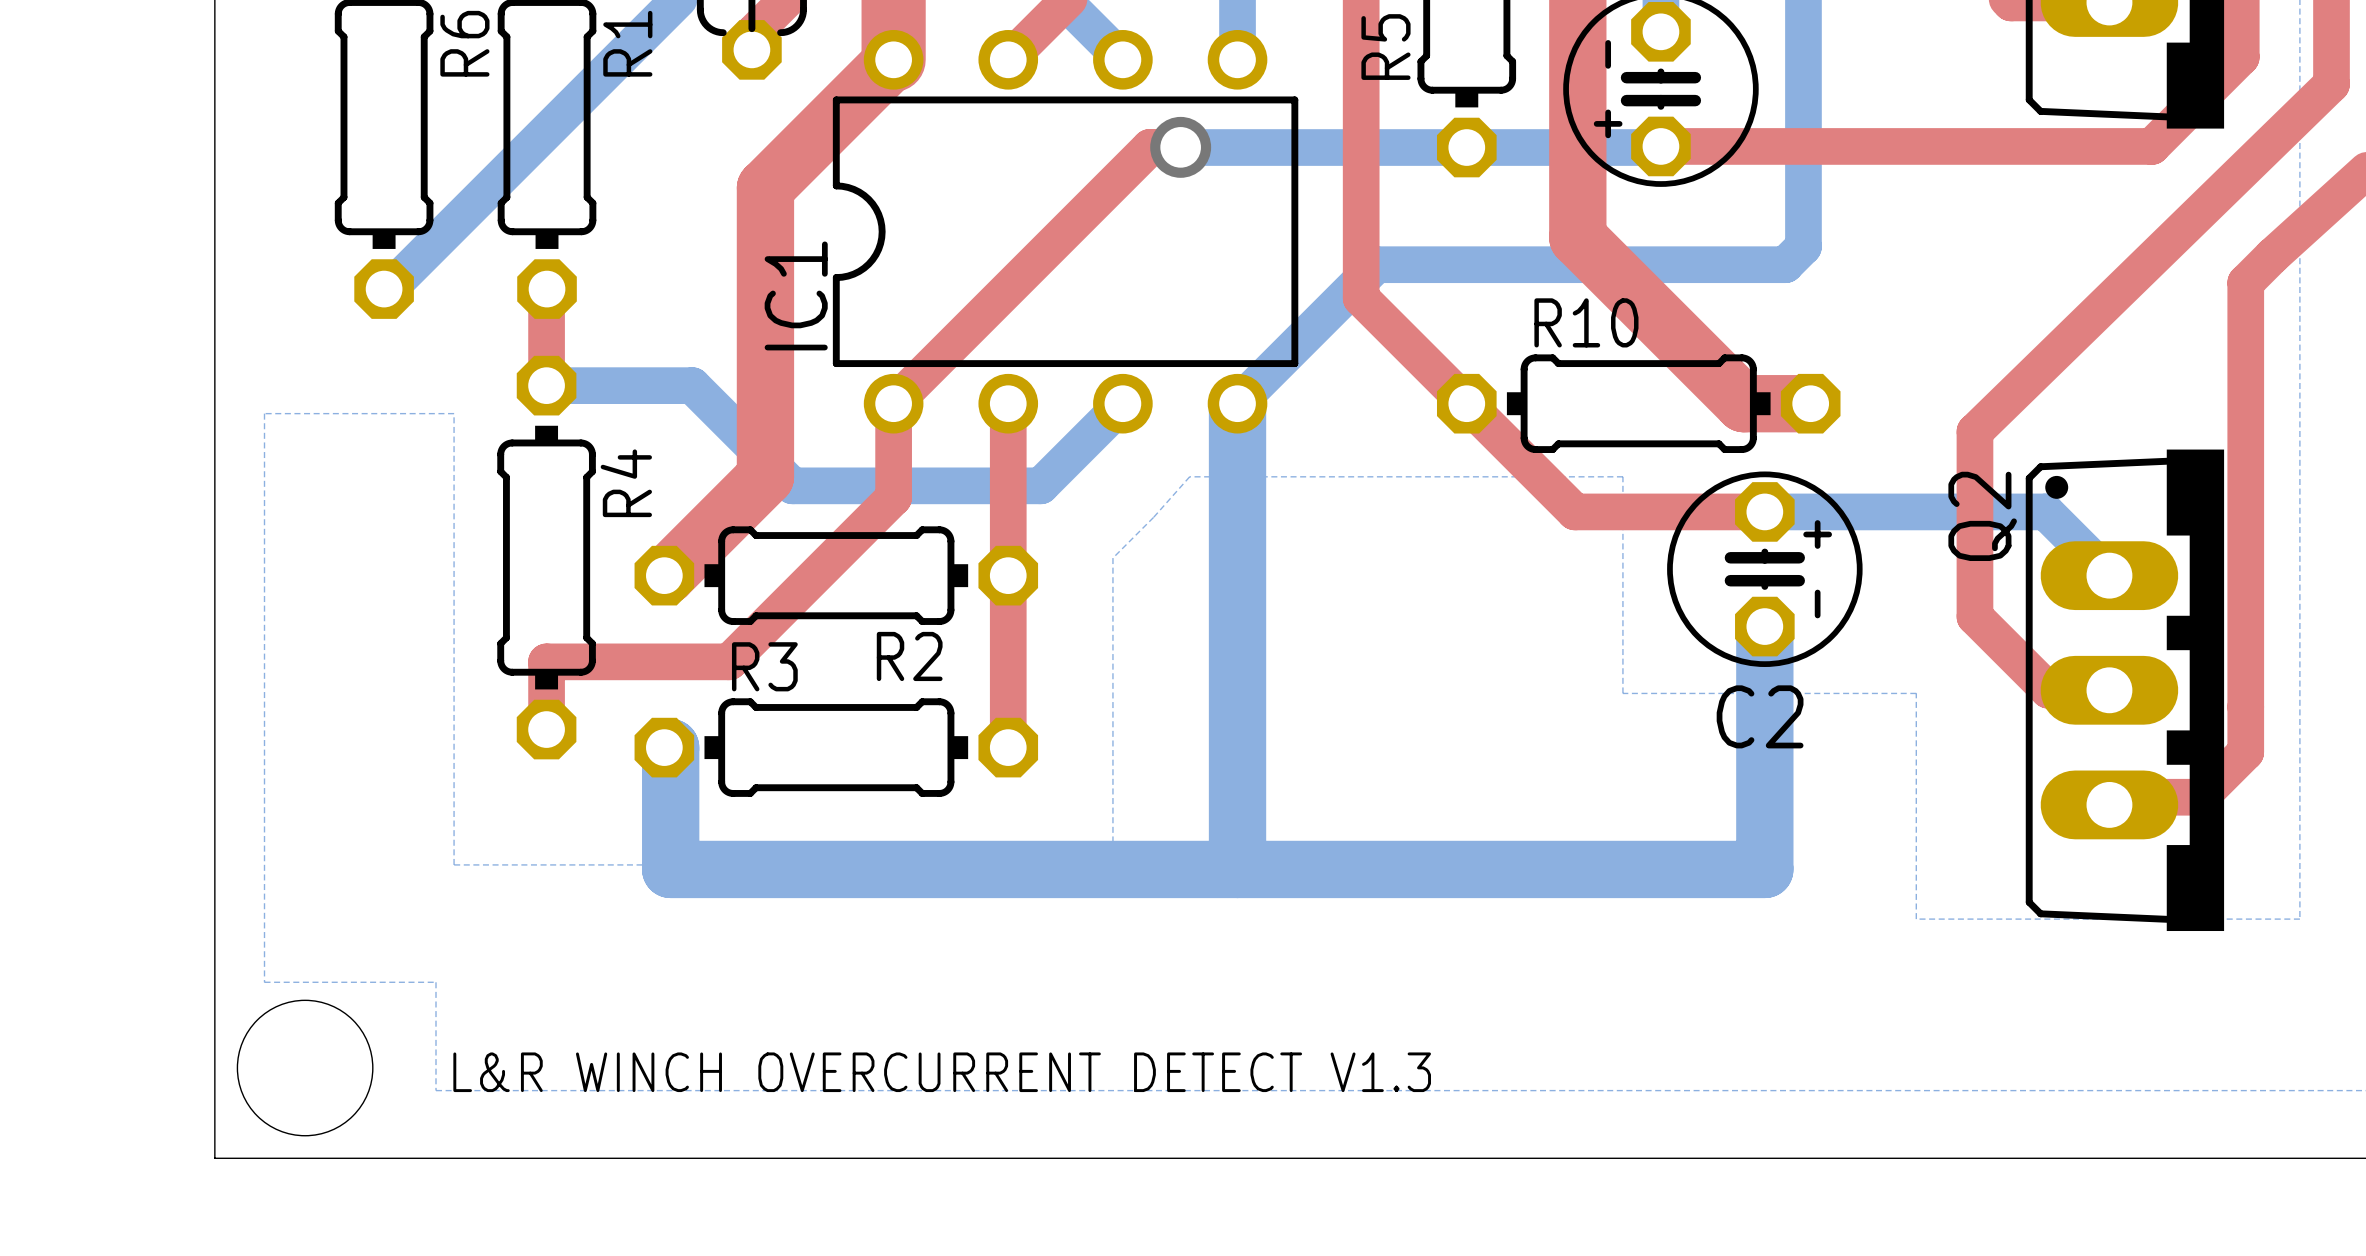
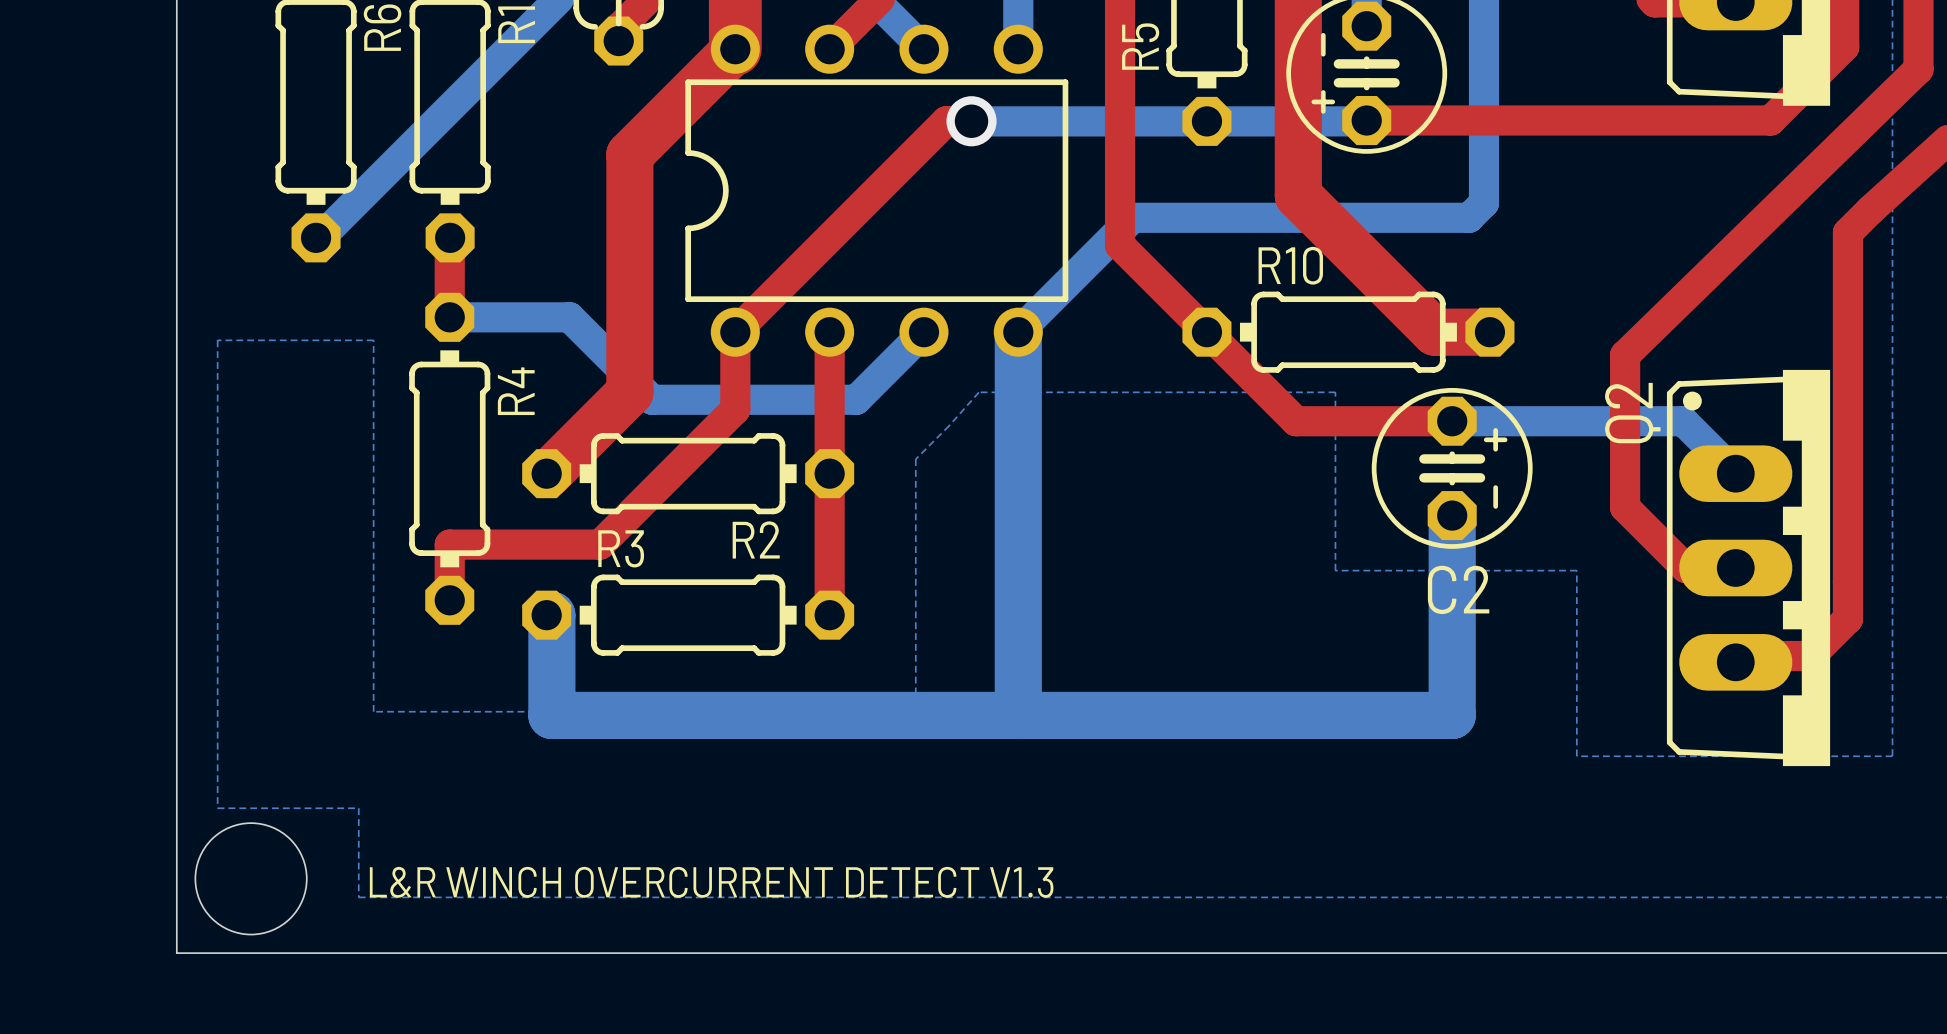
IC1 name: IC1 (796, 295) -> none

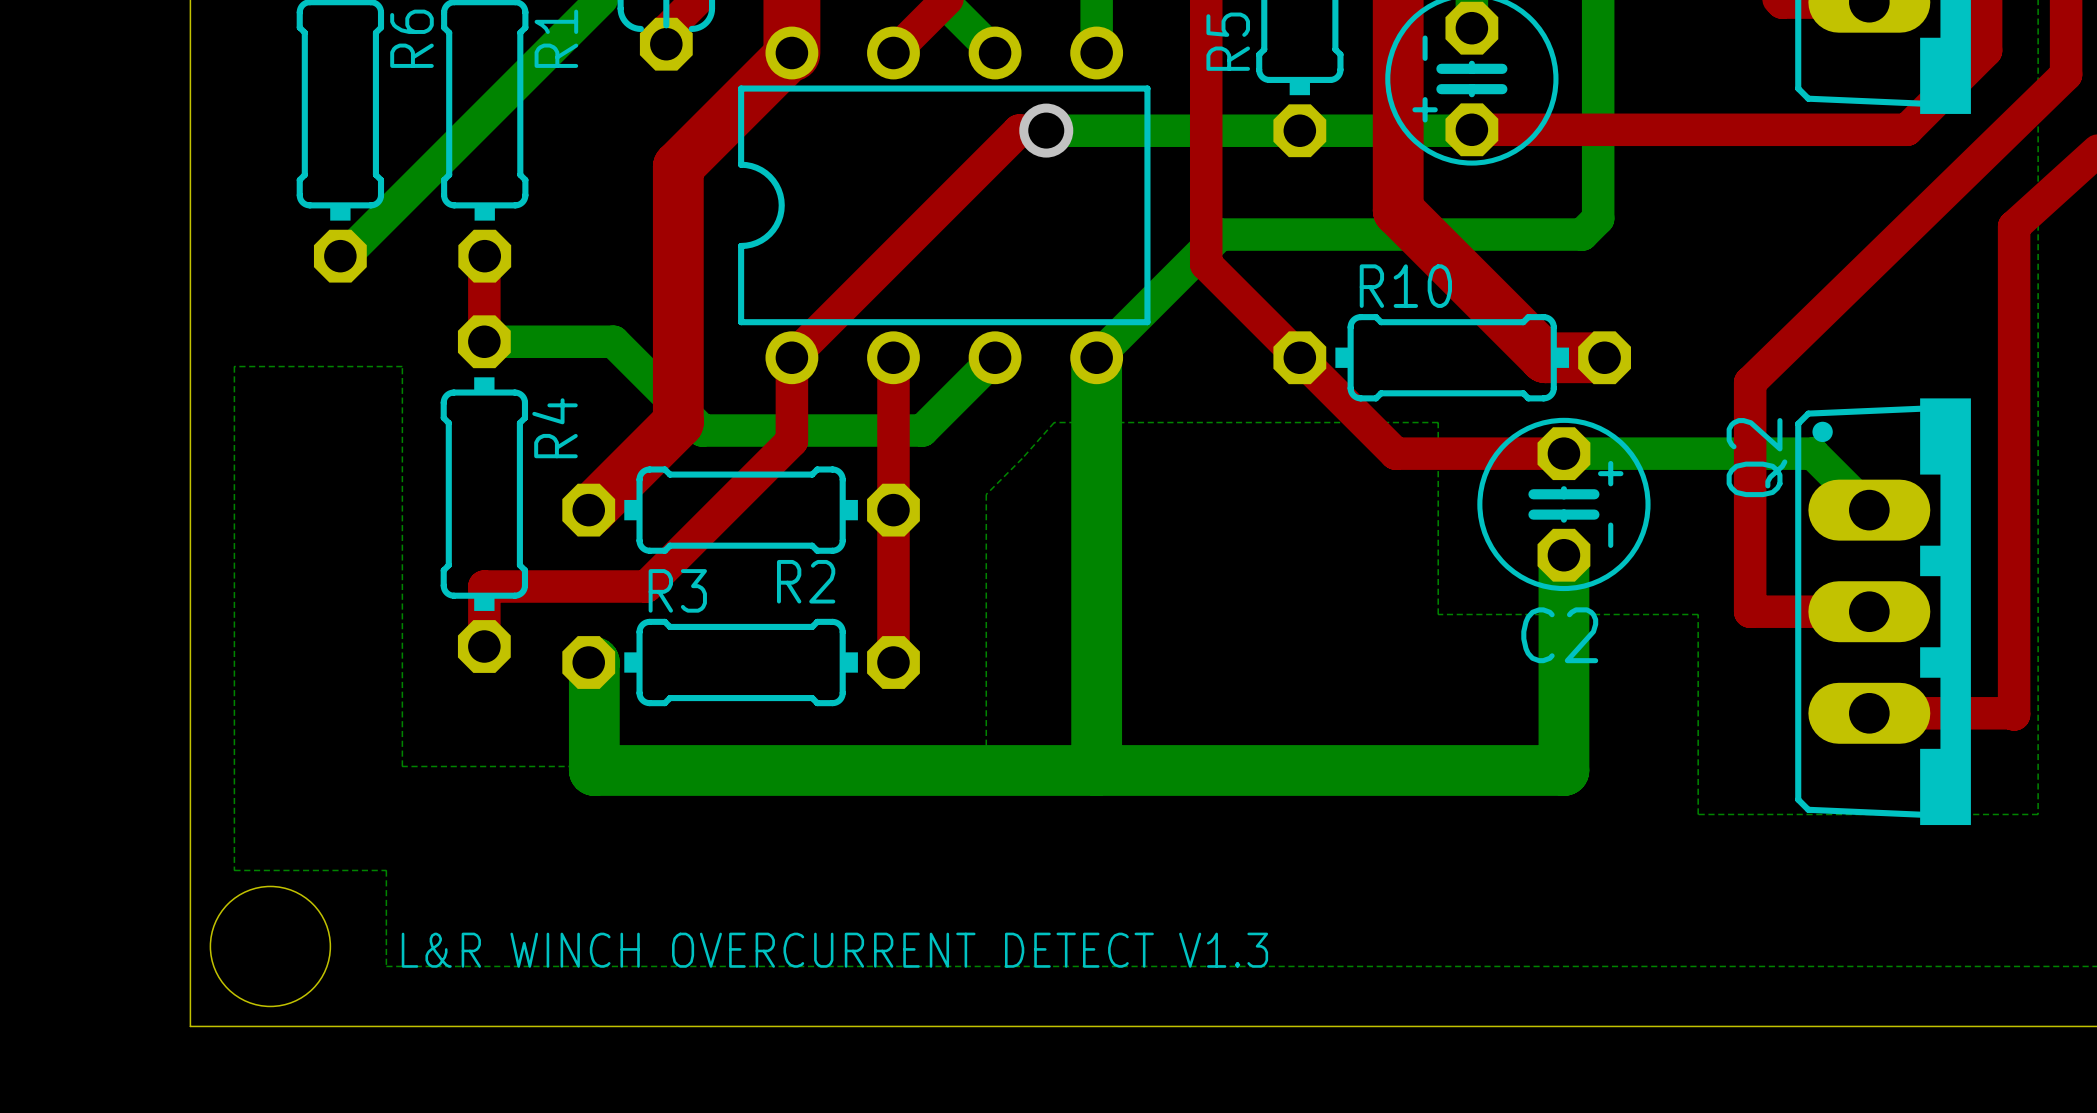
top track: (1870, 210) (1847, 232) (1847, 618) (1810, 656) (1742, 656) (1735, 662) -> (2014, 226) (2014, 714) (1869, 713)
top track: (1625, 507) (1685, 568) -> (1750, 546) (1750, 611) (1815, 611)

